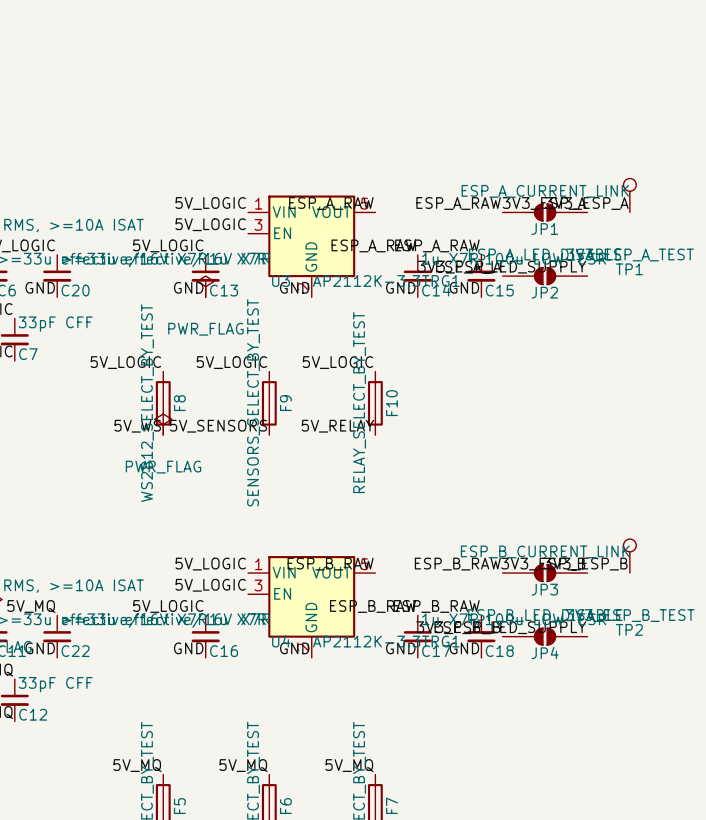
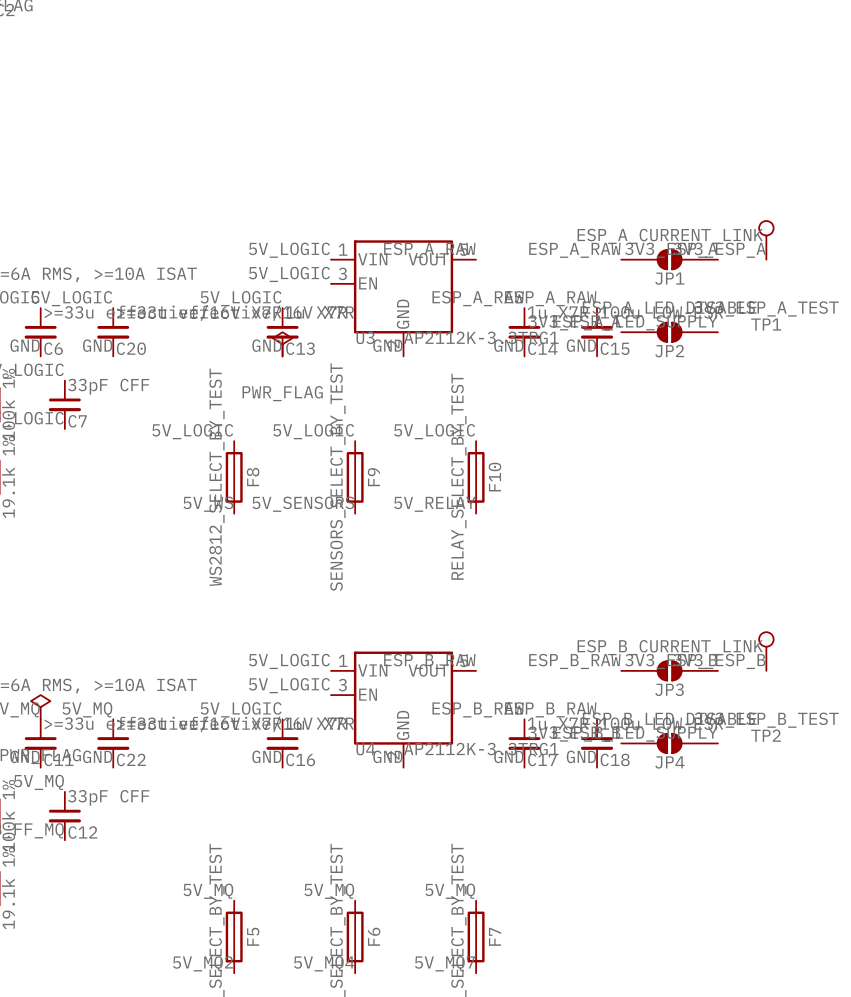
power symbol: PWR_FLAG (163, 424) -> none

